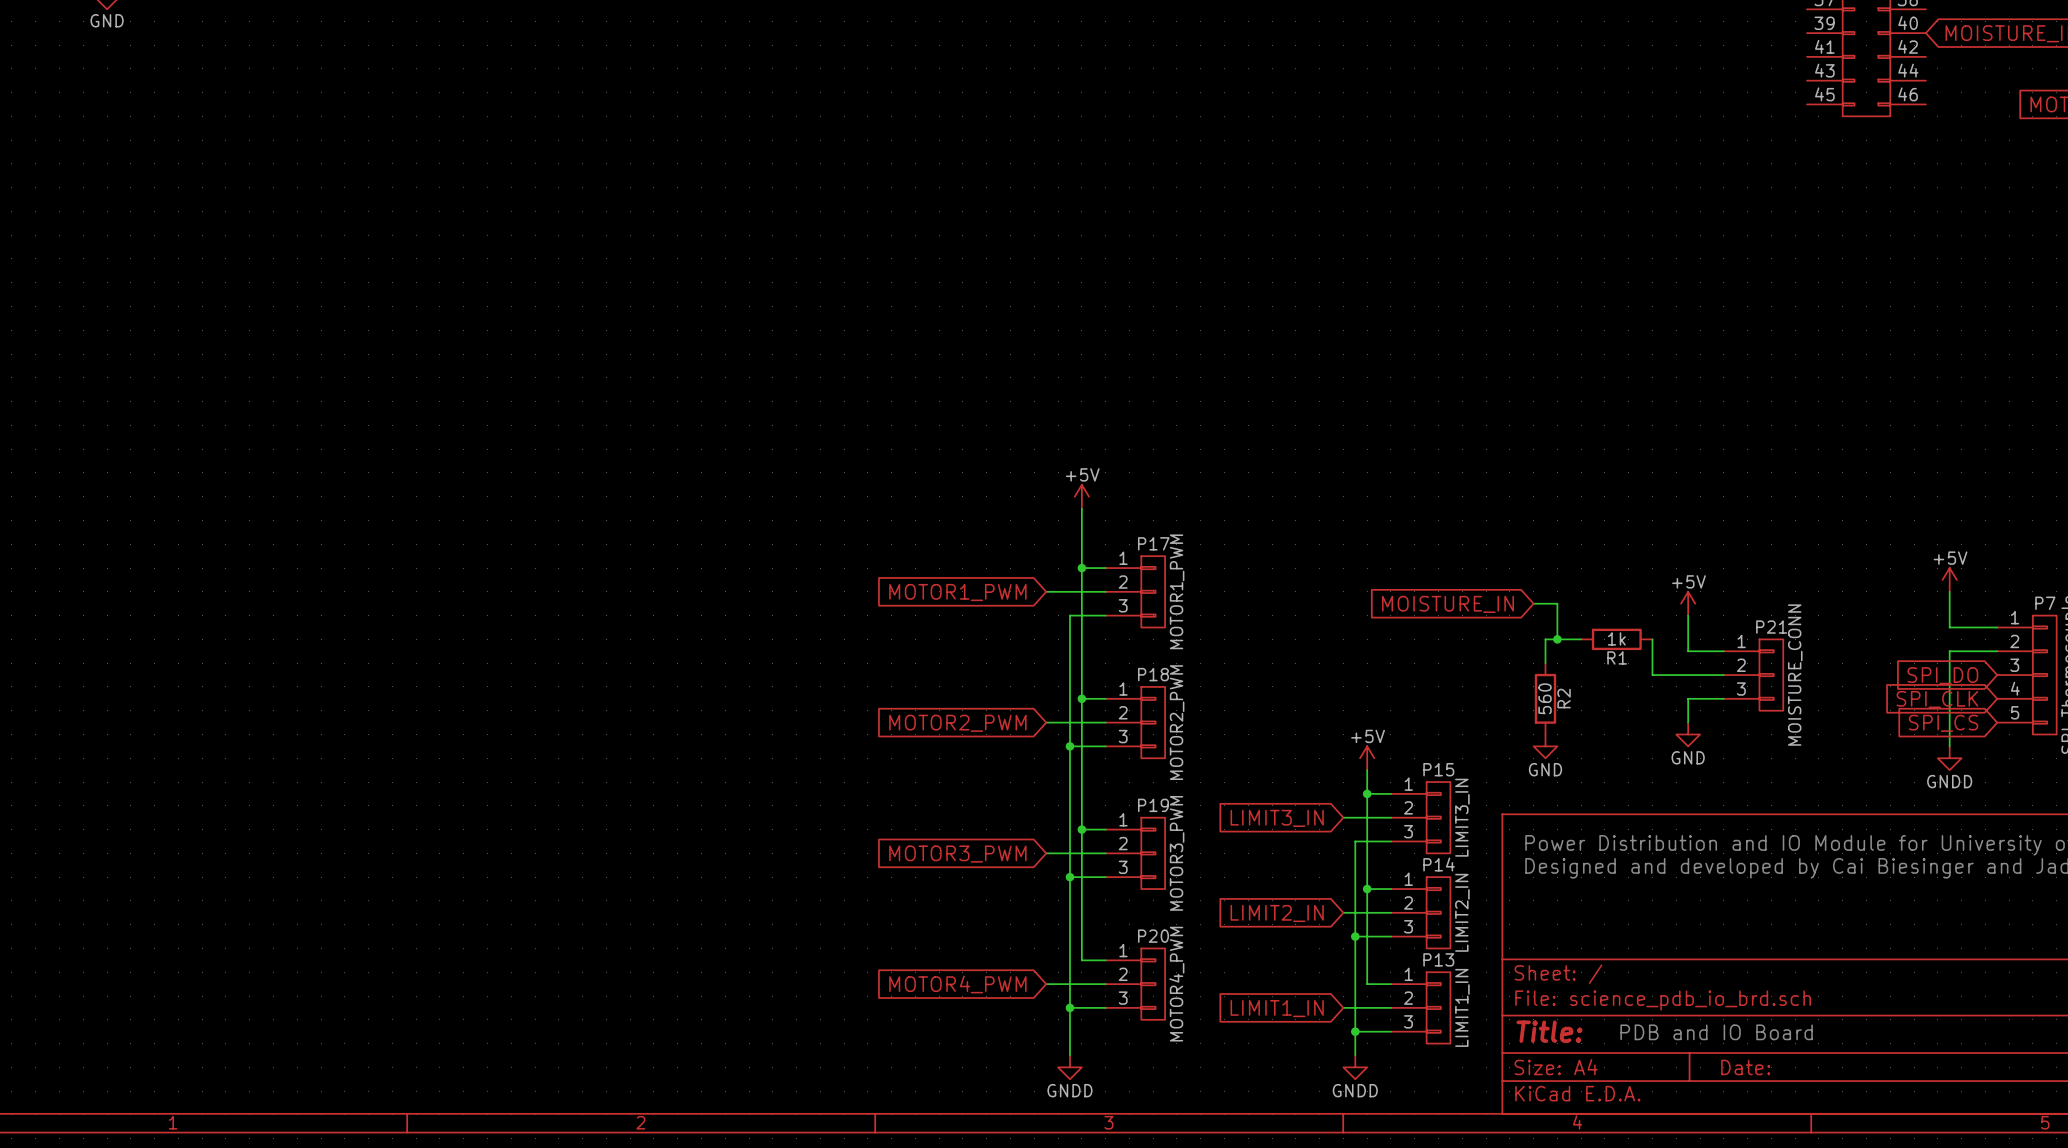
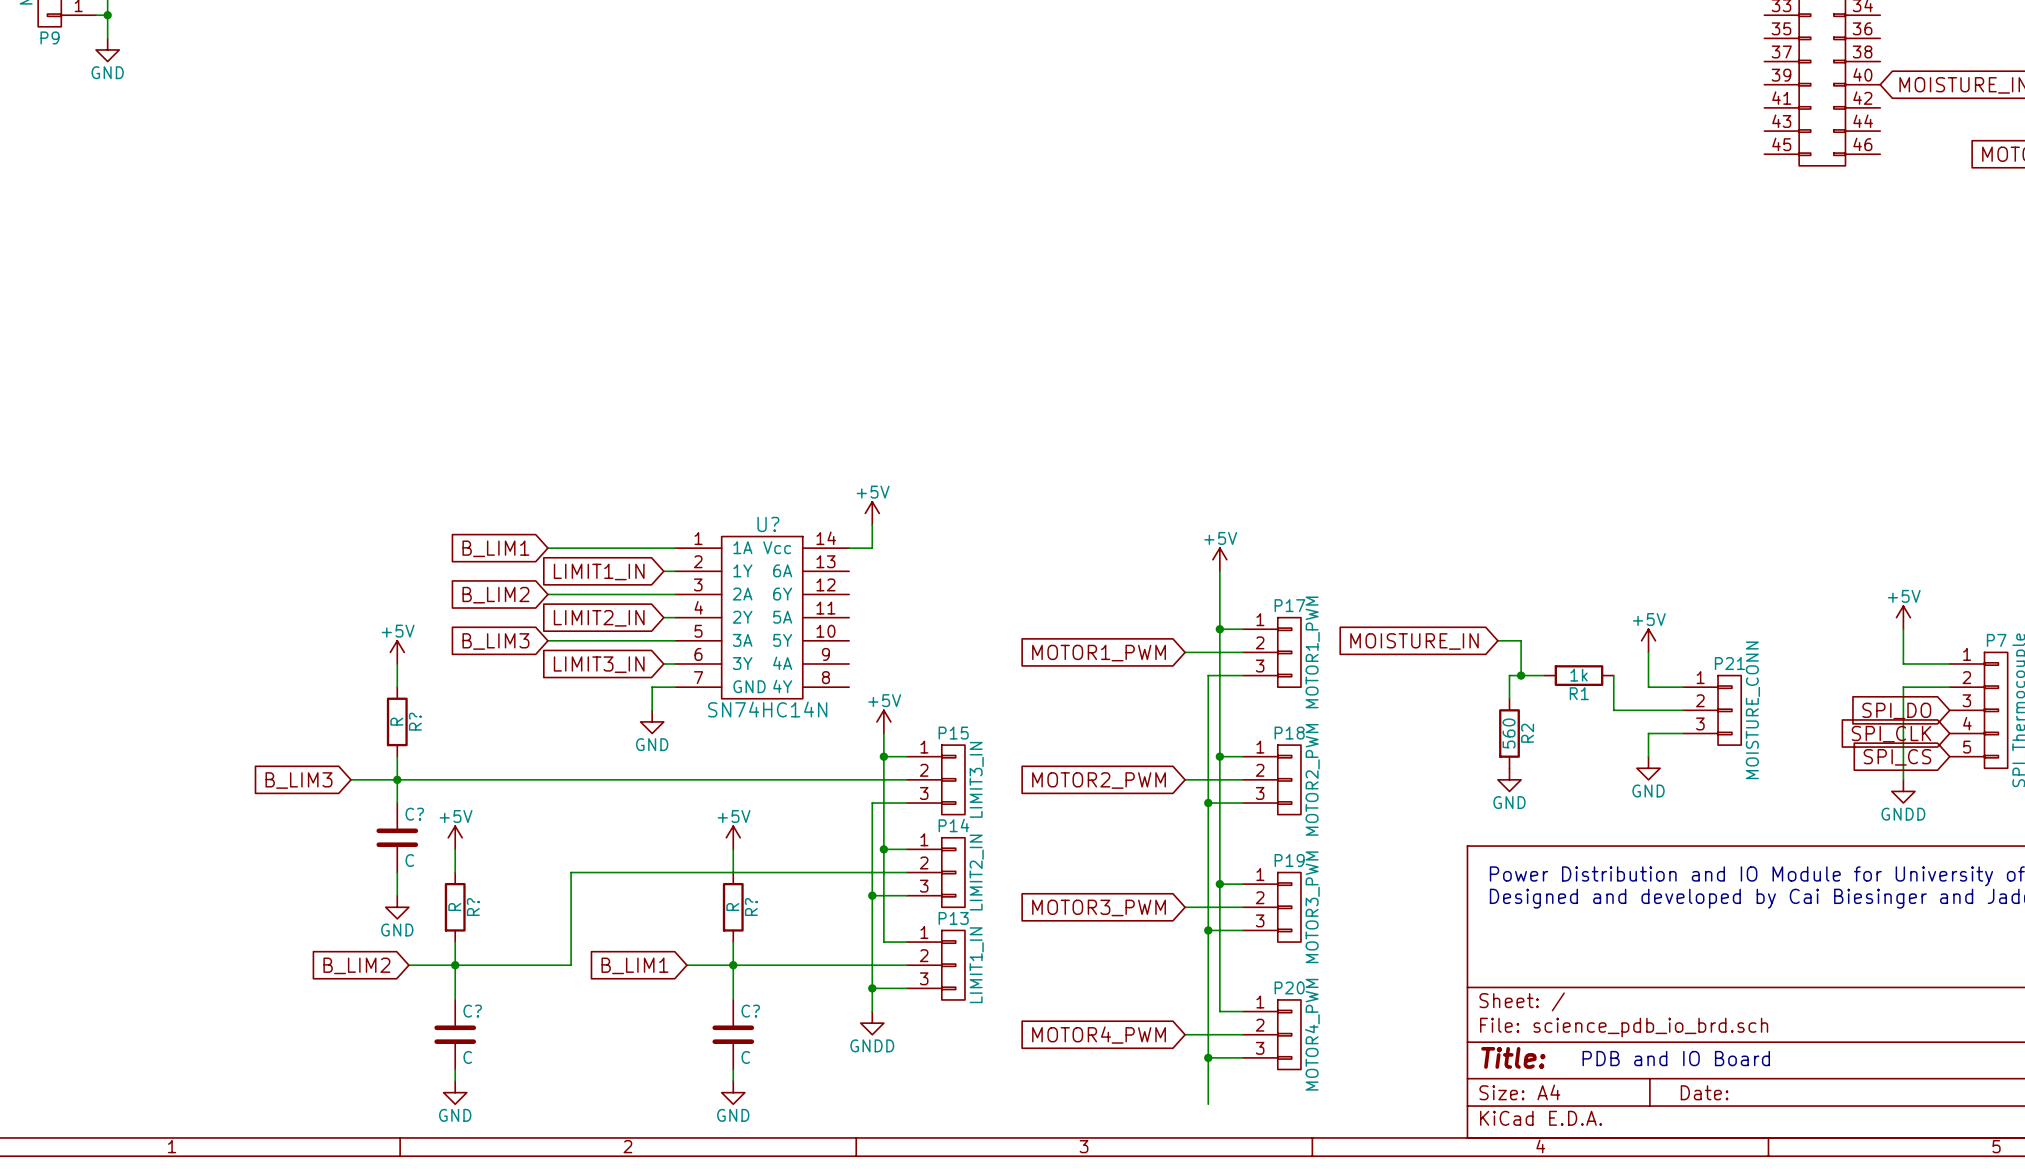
power symbol: none -> +5V (872, 513)
wire: none -> (872, 524) (872, 548) (849, 548)
power symbol: +5V (1081, 496) -> none
wire: none -> (547, 548) (675, 548)
wire: (1081, 508) (1081, 960) (1105, 960) -> (1219, 571) (1219, 1011) (1243, 1011)
global label: none -> B_LIM1 (495, 548)
power symbol: none -> +5V (1219, 559)
wire: none -> (663, 571) (675, 571)
global label: none -> LIMIT1_IN (599, 571)
global label: none -> B_LIM2 (495, 595)
wire: none -> (547, 594) (675, 594)
wire: (1081, 568) (1105, 568) -> (1219, 629) (1243, 629)
junction: (1081, 568) -> none
wire: none -> (663, 617) (675, 617)
U?: none -> SN74HC14N (762, 617)
global label: none -> LIMIT2_IN (599, 618)
wire: (1046, 591) (1105, 591) -> (1185, 652) (1243, 652)
P17 position: (1135, 591) -> (1271, 652)
junction: none -> (1219, 629)
global label position: MOTOR1_PWM (957, 592) -> MOTOR1_PWM (1099, 653)
wire: none -> (547, 640) (675, 640)
global label: none -> B_LIM3 (495, 641)
power symbol: none -> +5V (397, 652)
wire: (1105, 615) (1069, 615) (1069, 1055) -> (1243, 675) (1208, 675) (1208, 1104)
wire: none -> (397, 663) (397, 687)
wire: none -> (663, 663) (675, 663)
global label: none -> LIMIT3_IN (599, 664)
wire: none -> (675, 687) (652, 687) (652, 710)
R?: none -> R (397, 721)
power symbol: none -> GND (652, 721)
power symbol: none -> +5V (883, 721)
wire: none -> (883, 733) (883, 942) (907, 942)
wire: (1081, 698) (1105, 698) -> (1219, 756) (1243, 756)
junction: (1081, 698) -> none
wire: none -> (397, 756) (397, 803)
wire: none -> (883, 756) (907, 756)
junction: none -> (883, 756)
wire: (1046, 722) (1105, 722) -> (1185, 779) (1243, 779)
P18 position: (1135, 722) -> (1271, 779)
junction: none -> (1219, 756)
global label position: MOTOR2_PWM (957, 723) -> MOTOR2_PWM (1099, 780)
wire: none -> (350, 779) (907, 779)
junction: none -> (397, 779)
wire: (1069, 746) (1105, 746) -> (1208, 803) (1243, 803)
junction: (1069, 746) -> none
global label: none -> B_LIM3 (298, 780)
power symbol: +5V (1367, 758) -> none
wire: none -> (907, 803) (872, 803) (872, 1011)
junction: none -> (1208, 803)
wire: (1367, 770) (1367, 984) (1390, 984) -> none
wire: (1367, 793) (1390, 793) -> none
junction: (1367, 793) -> none
C?: none -> C (397, 837)
power symbol: none -> +5V (455, 837)
power symbol: none -> +5V (733, 837)
wire: none -> (455, 849) (455, 872)
wire: none -> (733, 849) (733, 872)
wire: none -> (883, 849) (907, 849)
junction: none -> (883, 849)
wire: (1343, 817) (1390, 817) -> none
P15 position: (1420, 817) -> (936, 779)
global label: LIMIT3_IN (1277, 818) -> none
wire: (1081, 829) (1105, 829) -> (1219, 884) (1243, 884)
junction: (1081, 829) -> none
wire: none -> (397, 872) (397, 895)
wire: none -> (907, 872) (571, 872) (571, 965) (408, 965)
wire: (1390, 841) (1355, 841) (1355, 1055) -> none
wire: (1046, 853) (1105, 853) -> (1185, 907) (1243, 907)
P19 position: (1135, 853) -> (1271, 907)
junction: none -> (1219, 884)
global label position: MOTOR3_PWM (957, 854) -> MOTOR3_PWM (1099, 907)
wire: none -> (872, 895) (907, 895)
junction: none -> (872, 895)
power symbol: none -> GND (397, 907)
R?: none -> R (455, 907)
R?: none -> R (733, 907)
wire: (1069, 877) (1105, 877) -> (1208, 930) (1243, 930)
junction: (1069, 877) -> none
wire: (1367, 889) (1390, 889) -> none
junction: (1367, 889) -> none
junction: none -> (1208, 930)
wire: none -> (455, 942) (455, 999)
wire: none -> (733, 942) (733, 999)
wire: (1343, 912) (1390, 912) -> none
P14 position: (1420, 912) -> (936, 872)
global label: LIMIT2_IN (1277, 913) -> none
junction: none -> (455, 965)
wire: none -> (686, 965) (907, 965)
junction: none -> (733, 965)
wire: (1355, 936) (1390, 936) -> none
junction: (1355, 936) -> none
global label: none -> B_LIM2 (356, 965)
global label: none -> B_LIM1 (634, 965)
wire: none -> (872, 988) (907, 988)
junction: none -> (872, 988)
global label position: MOTOR4_PWM (957, 984) -> MOTOR4_PWM (1099, 1035)
wire: (1046, 984) (1105, 984) -> (1185, 1034) (1243, 1034)
P20 position: (1135, 984) -> (1271, 1034)
C?: none -> C (455, 1034)
C?: none -> C (733, 1034)
wire: (1069, 1007) (1105, 1007) -> (1208, 1057) (1243, 1057)
junction: (1069, 1007) -> none
wire: (1343, 1007) (1390, 1007) -> none
P13 position: (1420, 1007) -> (936, 965)
global label: LIMIT1_IN (1277, 1008) -> none
junction: none -> (1208, 1057)
wire: (1355, 1031) (1390, 1031) -> none
junction: (1355, 1031) -> none
wire: none -> (455, 1069) (455, 1081)
wire: none -> (733, 1069) (733, 1081)
power symbol: none -> GND (455, 1092)
power symbol: none -> GND (733, 1092)
power symbol position: GNDD (1069, 1067) -> GNDD (872, 1023)
power symbol: GNDD (1355, 1067) -> none

